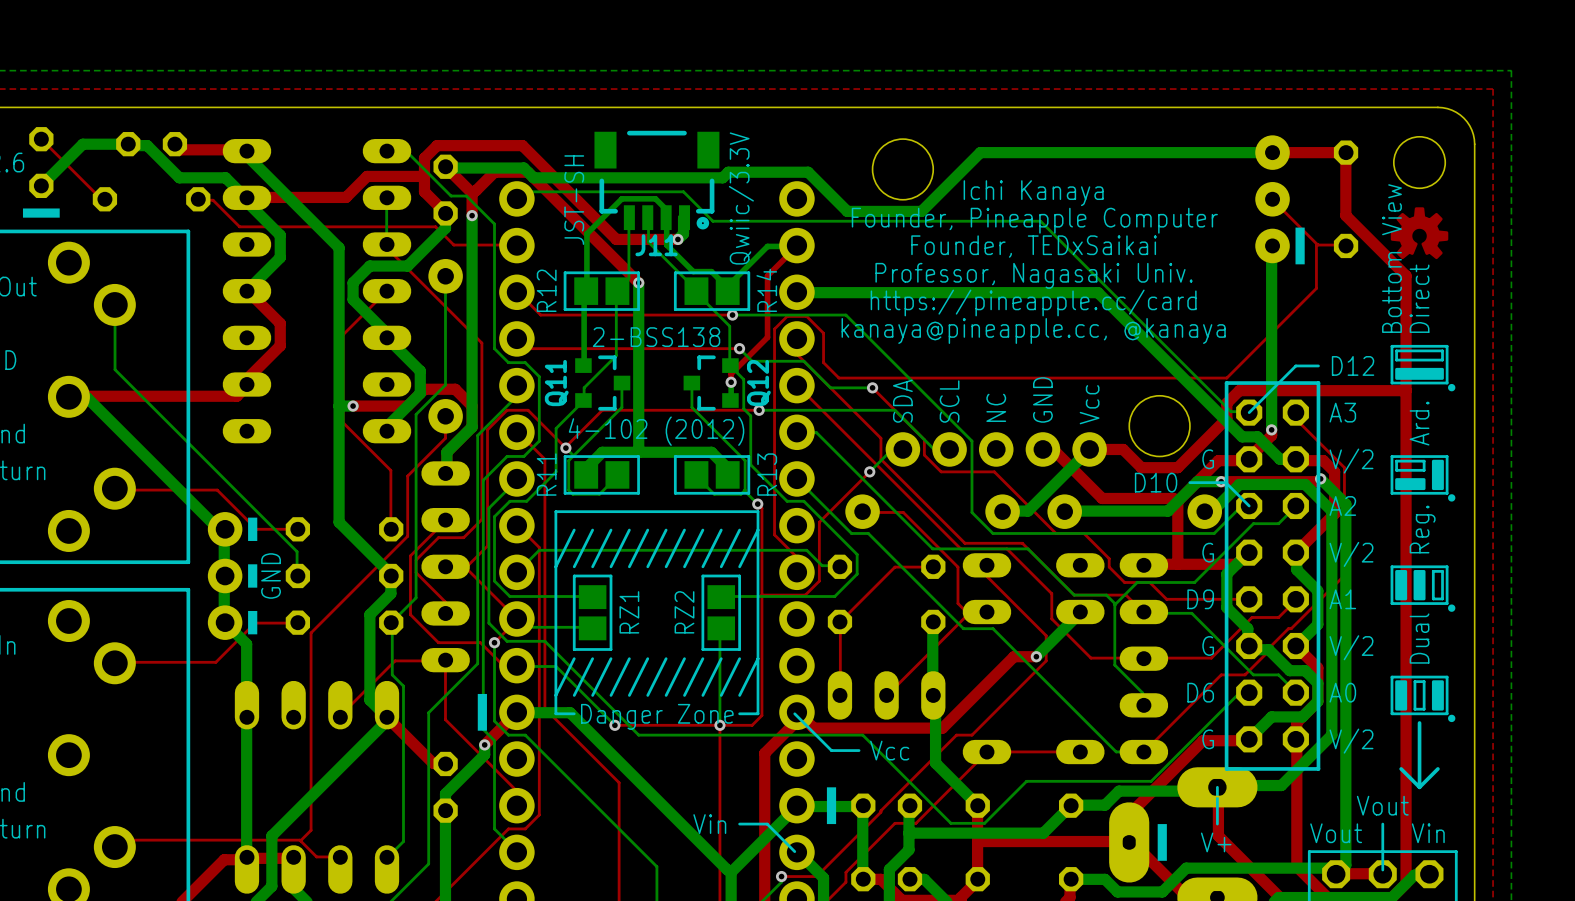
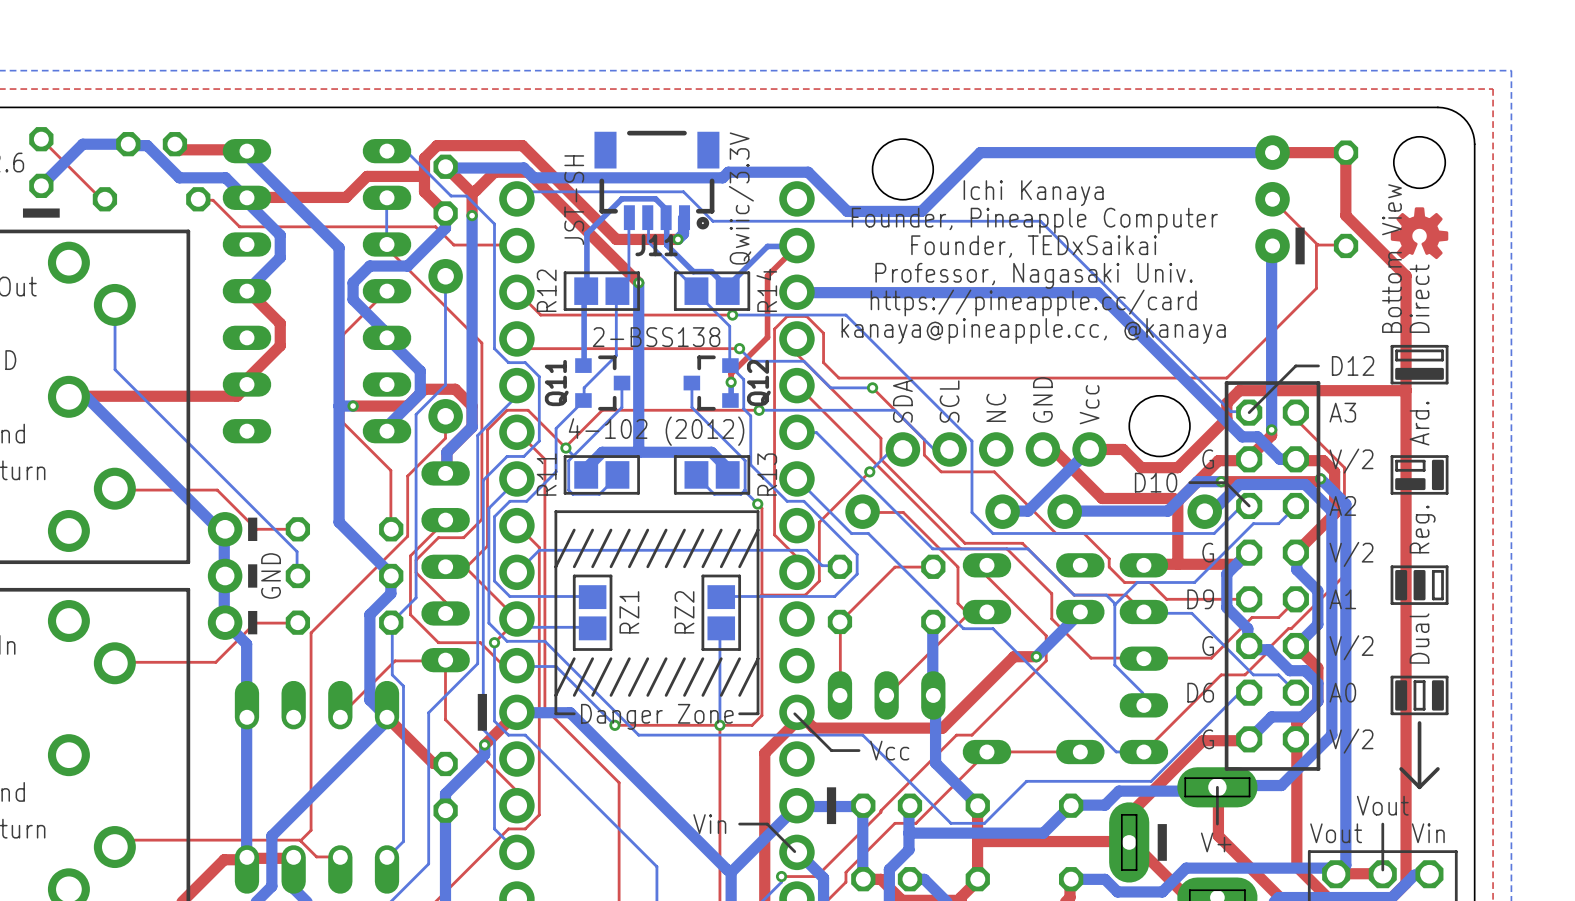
drawing: [1448, 383, 1456, 392] -> none
drawing: [1448, 494, 1456, 502] -> none
drawing: [1448, 604, 1456, 612] -> none
drawing: [1448, 714, 1456, 723] -> none

